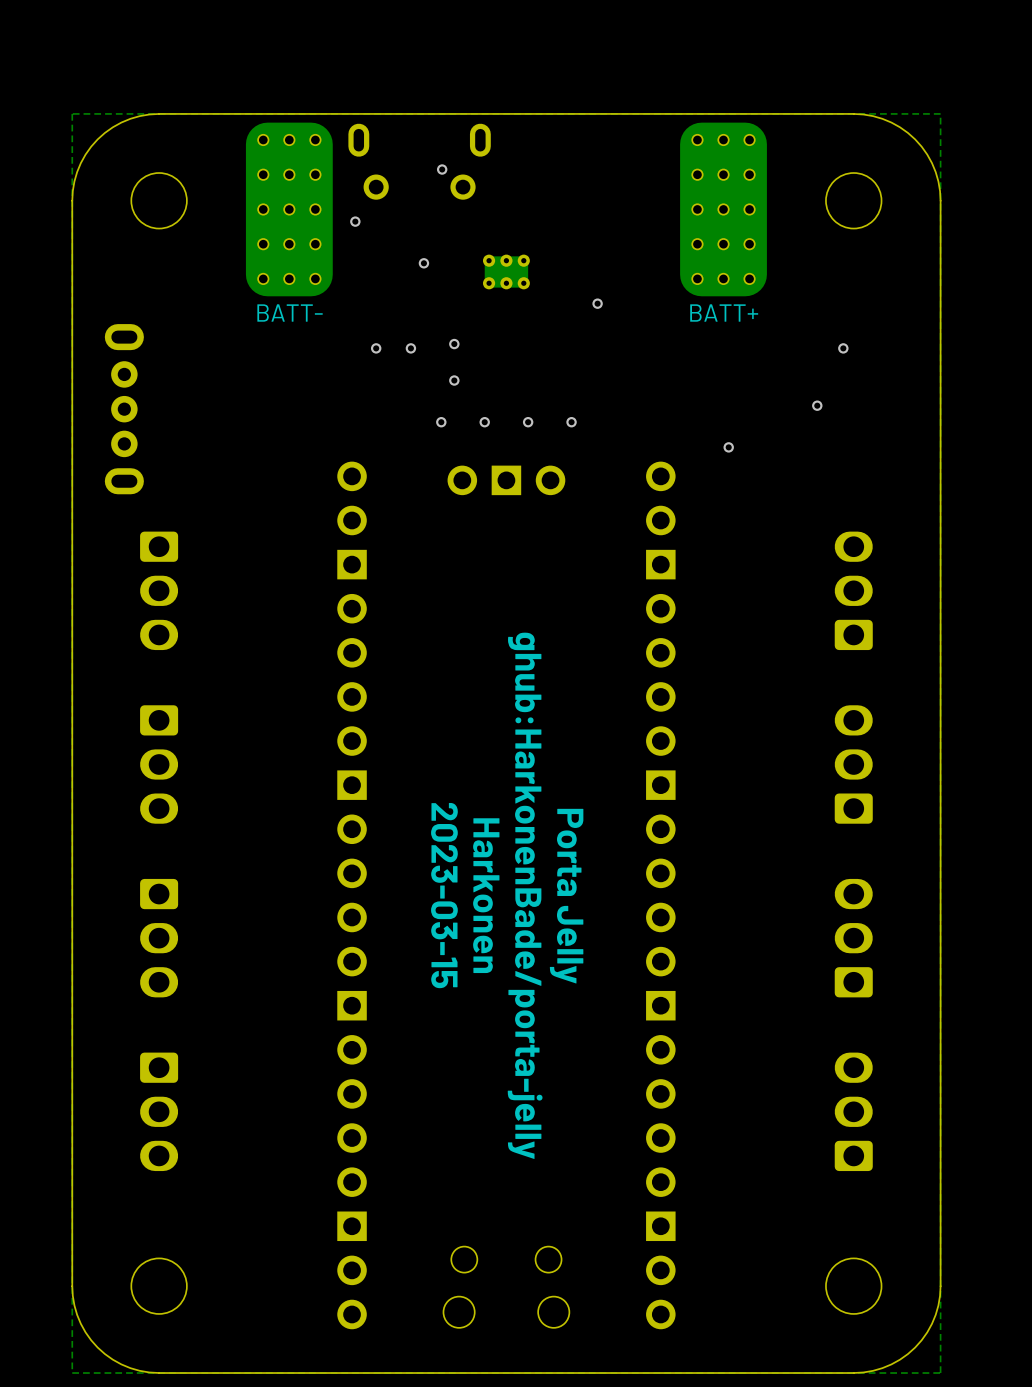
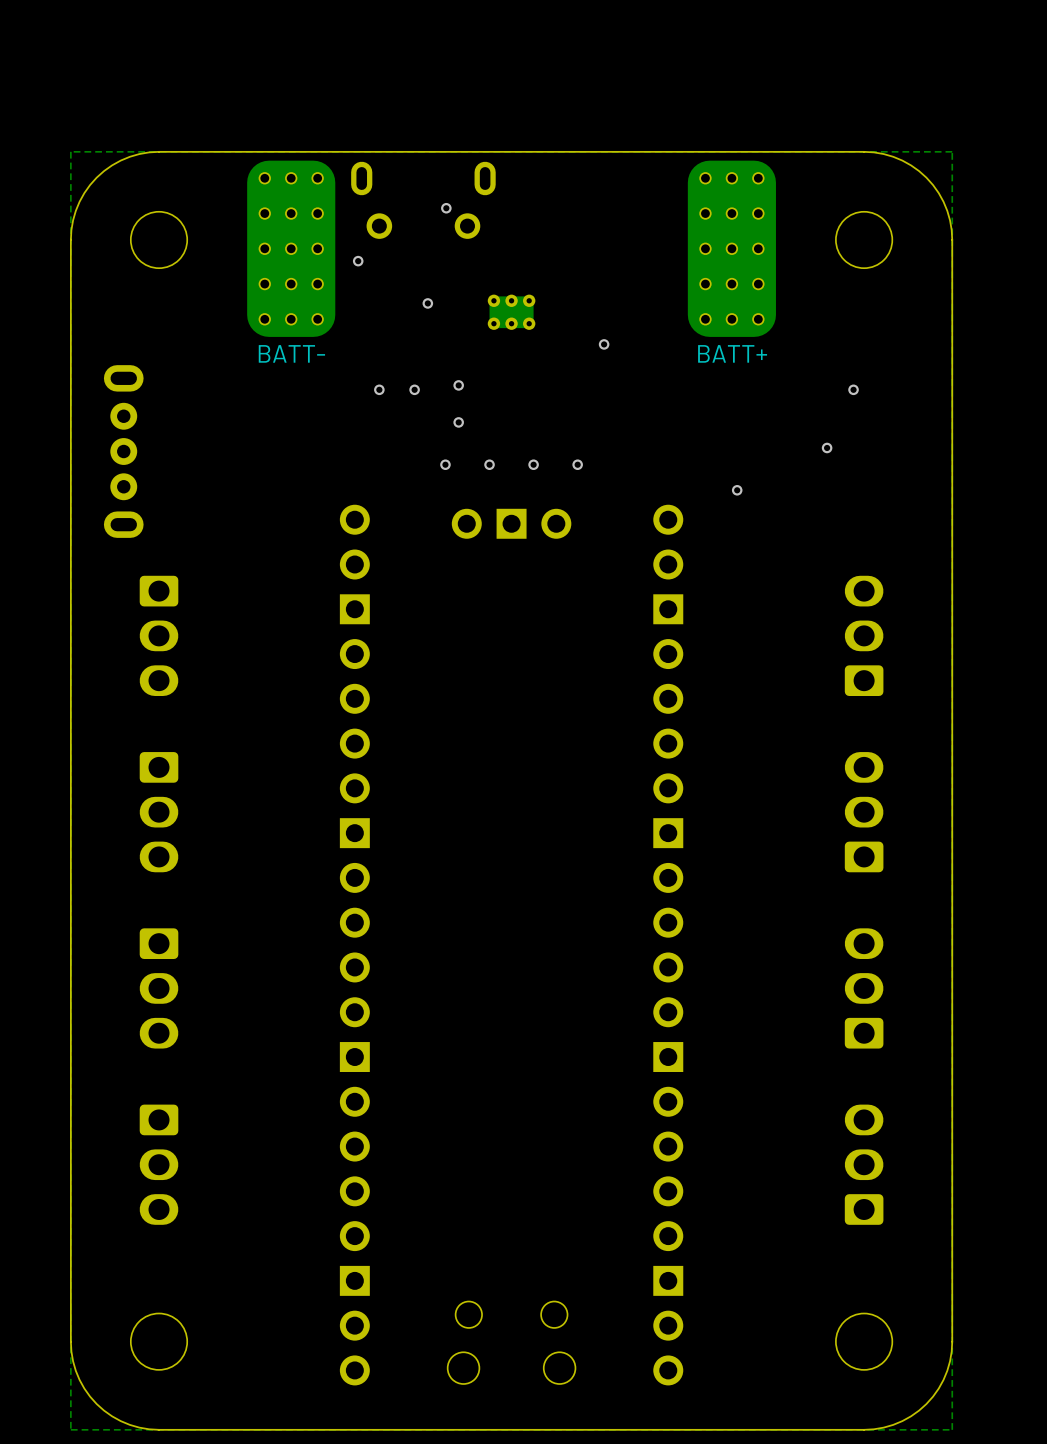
text: 2023-03-15 (444, 895) -> none
text: Harkonen (486, 895) -> none
text: ghub:HarkonenBade/porta-jelly (525, 895) -> none
text: Porta Jelly (566, 896) -> none

